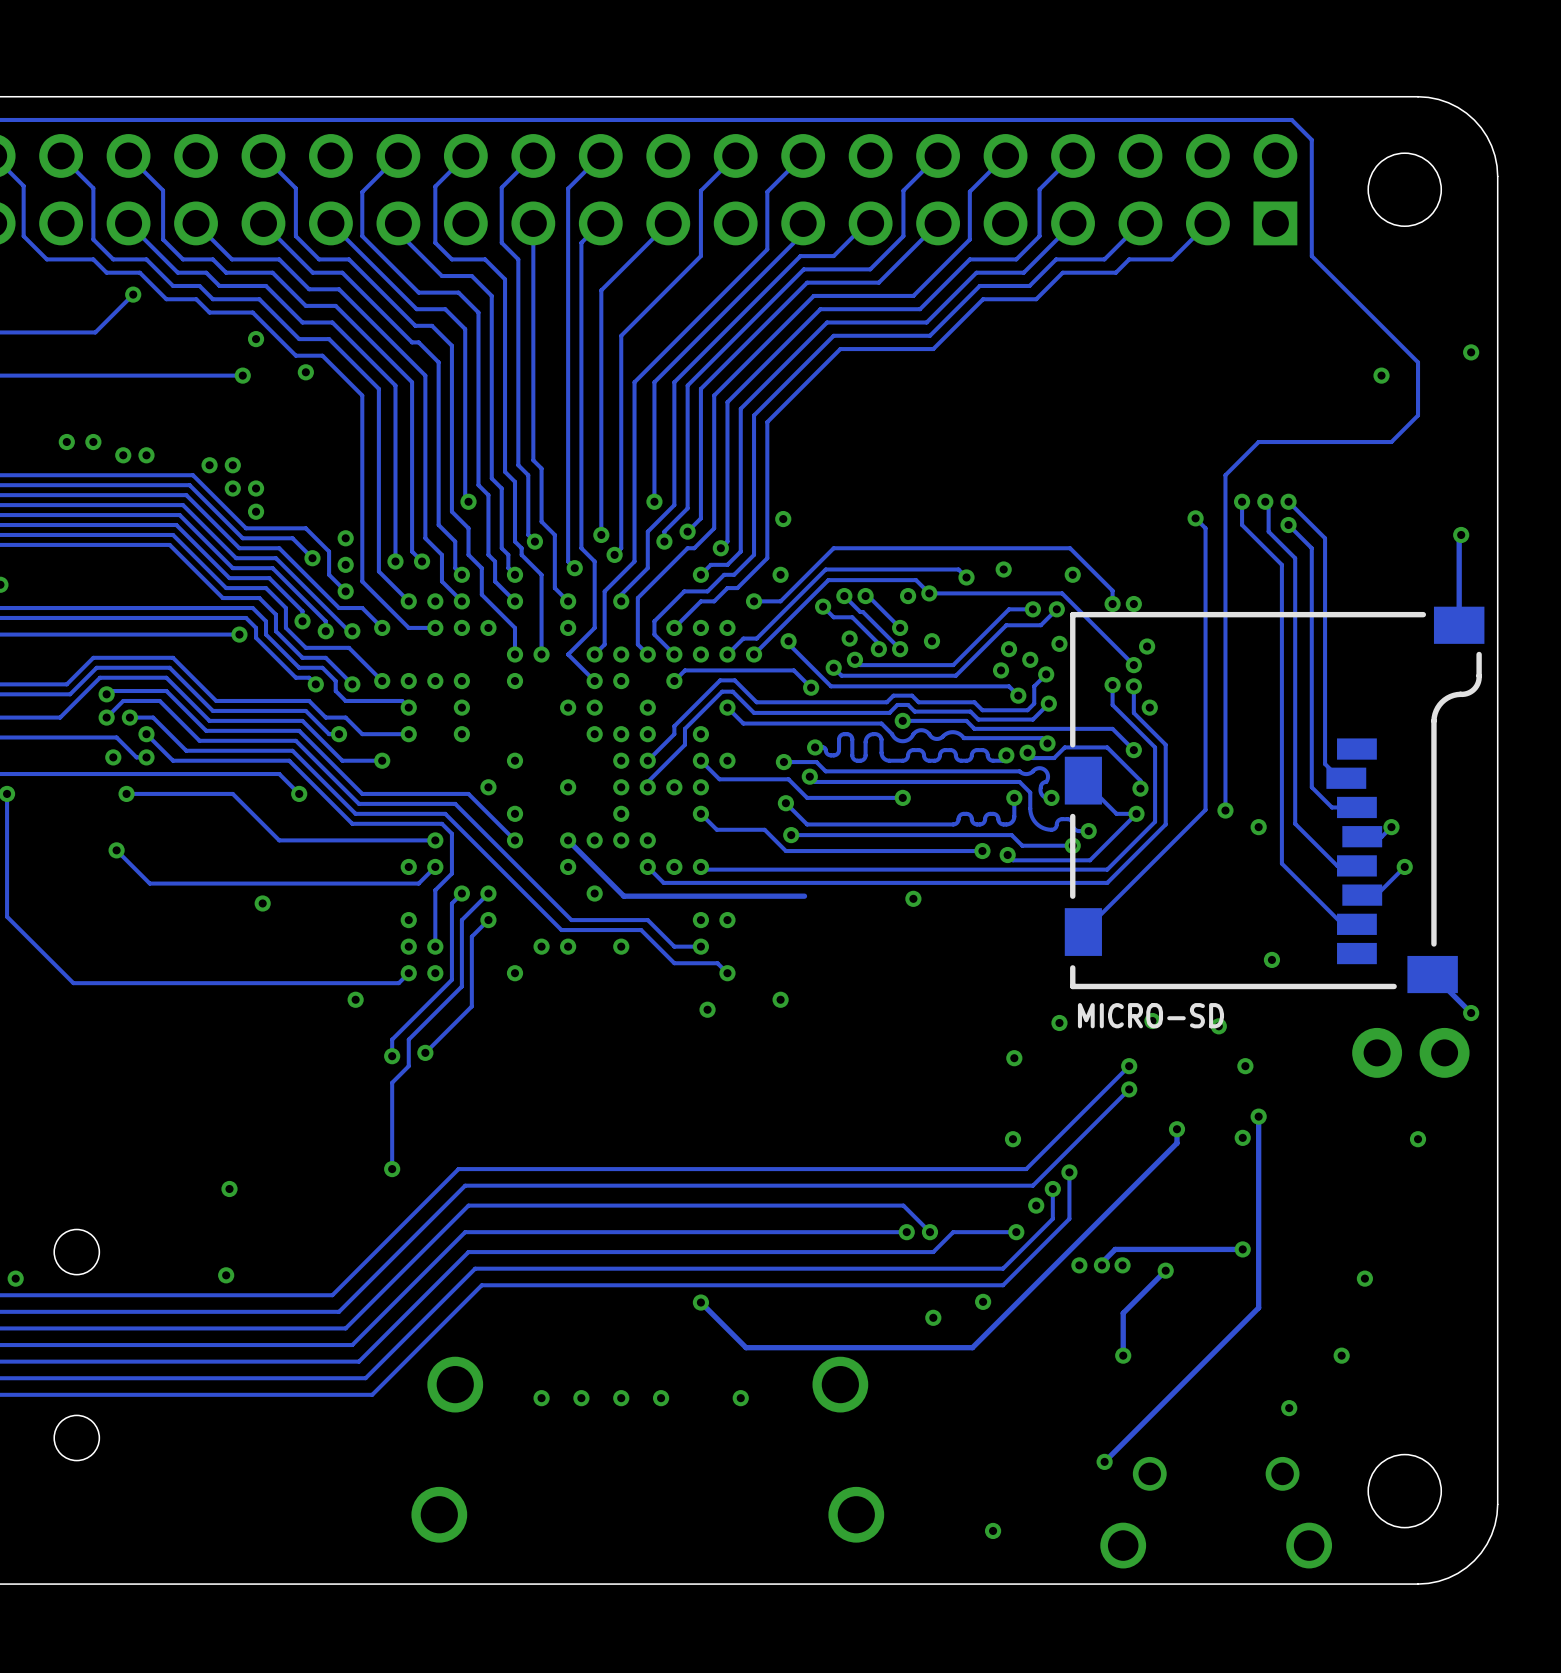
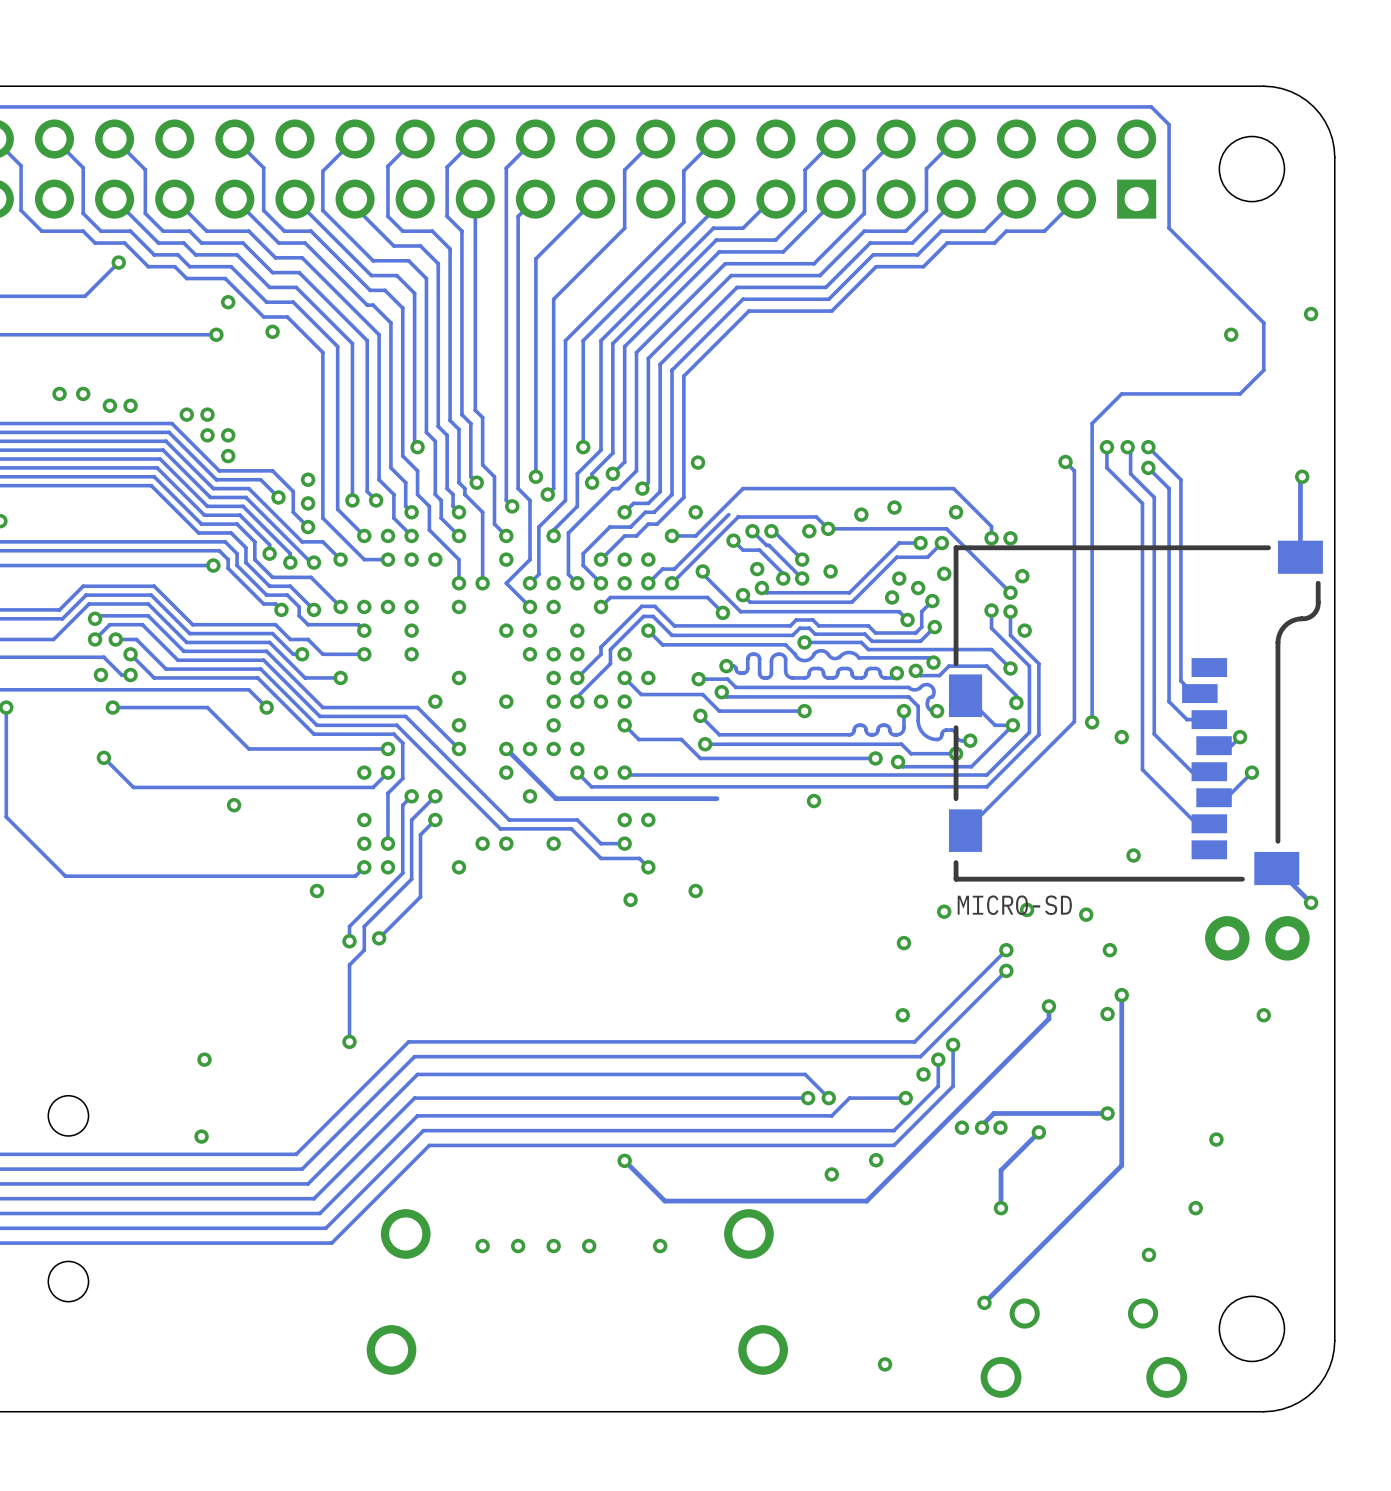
track: (966, 577) (958, 569) (825, 569) (817, 577) -> none
via: (15, 1278) -> none

